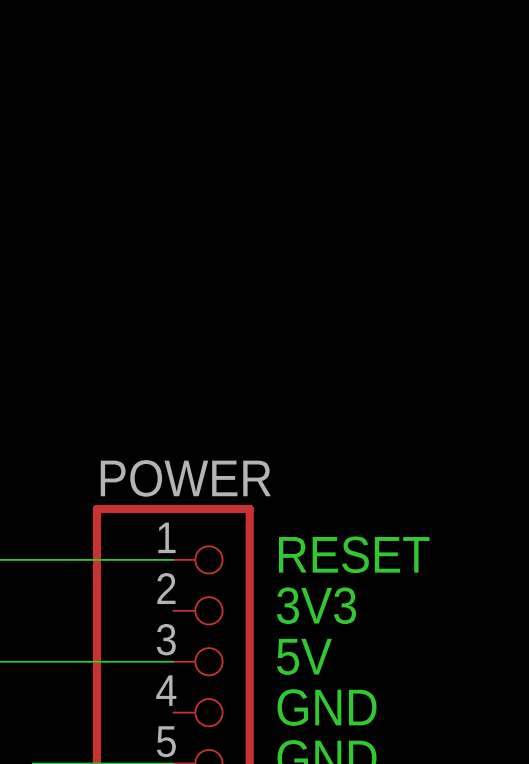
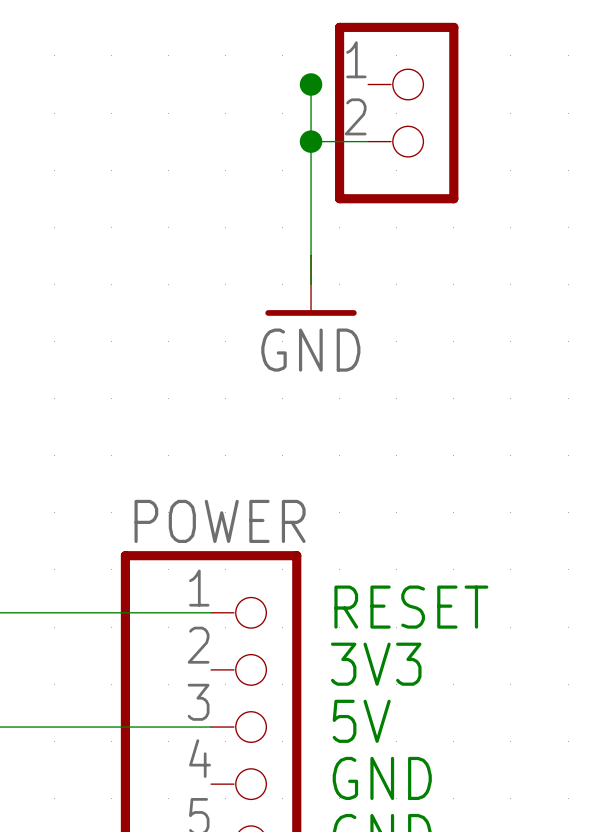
wire: none -> (311, 84) (311, 284)
junction: none -> (311, 84)
part: none -> (396, 113)
wire: none -> (311, 141) (368, 141)
junction: none -> (311, 141)
power symbol: none -> GND (311, 285)

